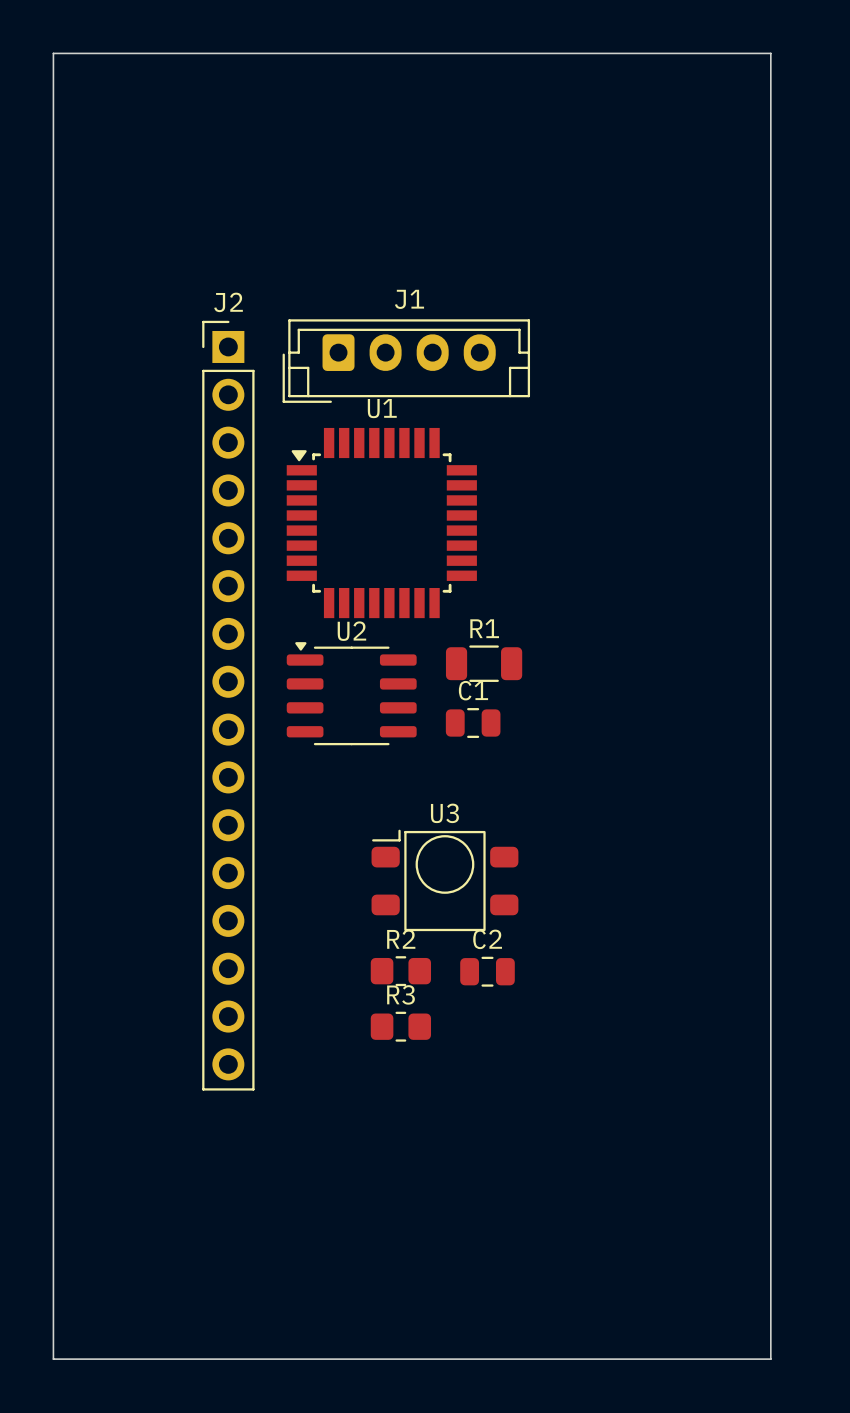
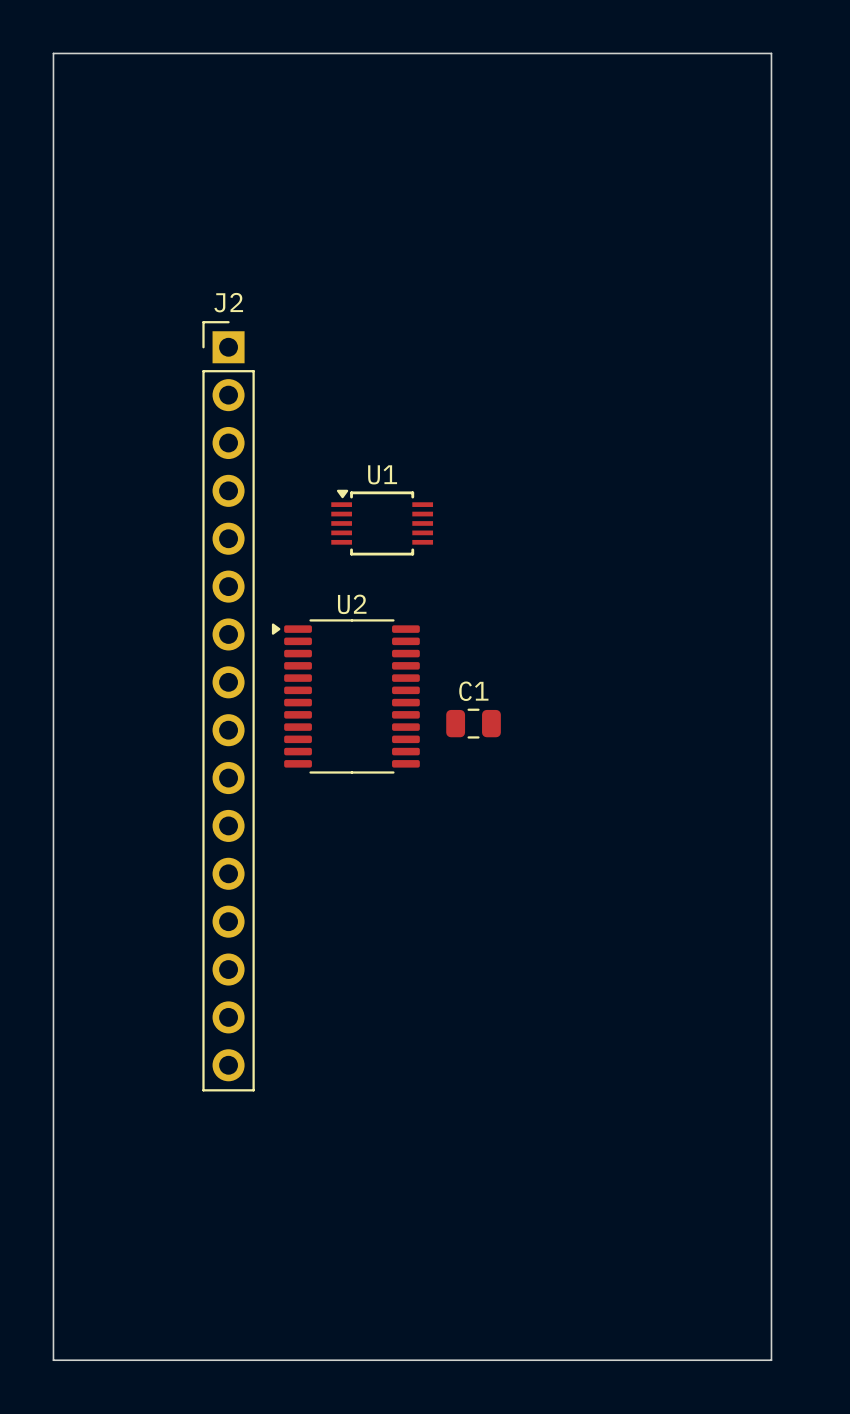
J1: (406, 361) -> none
U1 name position: U1 (382, 408) -> U1 (382, 474)
U1 footprint: [286, 427, 477, 619] -> [331, 489, 434, 556]
U2 footprint: [286, 642, 417, 746] -> [271, 619, 420, 774]
R1: (484, 663) -> none
U3: (444, 880) -> none
R2: (400, 971) -> none
C2: (487, 971) -> none
R3: (400, 1026) -> none

